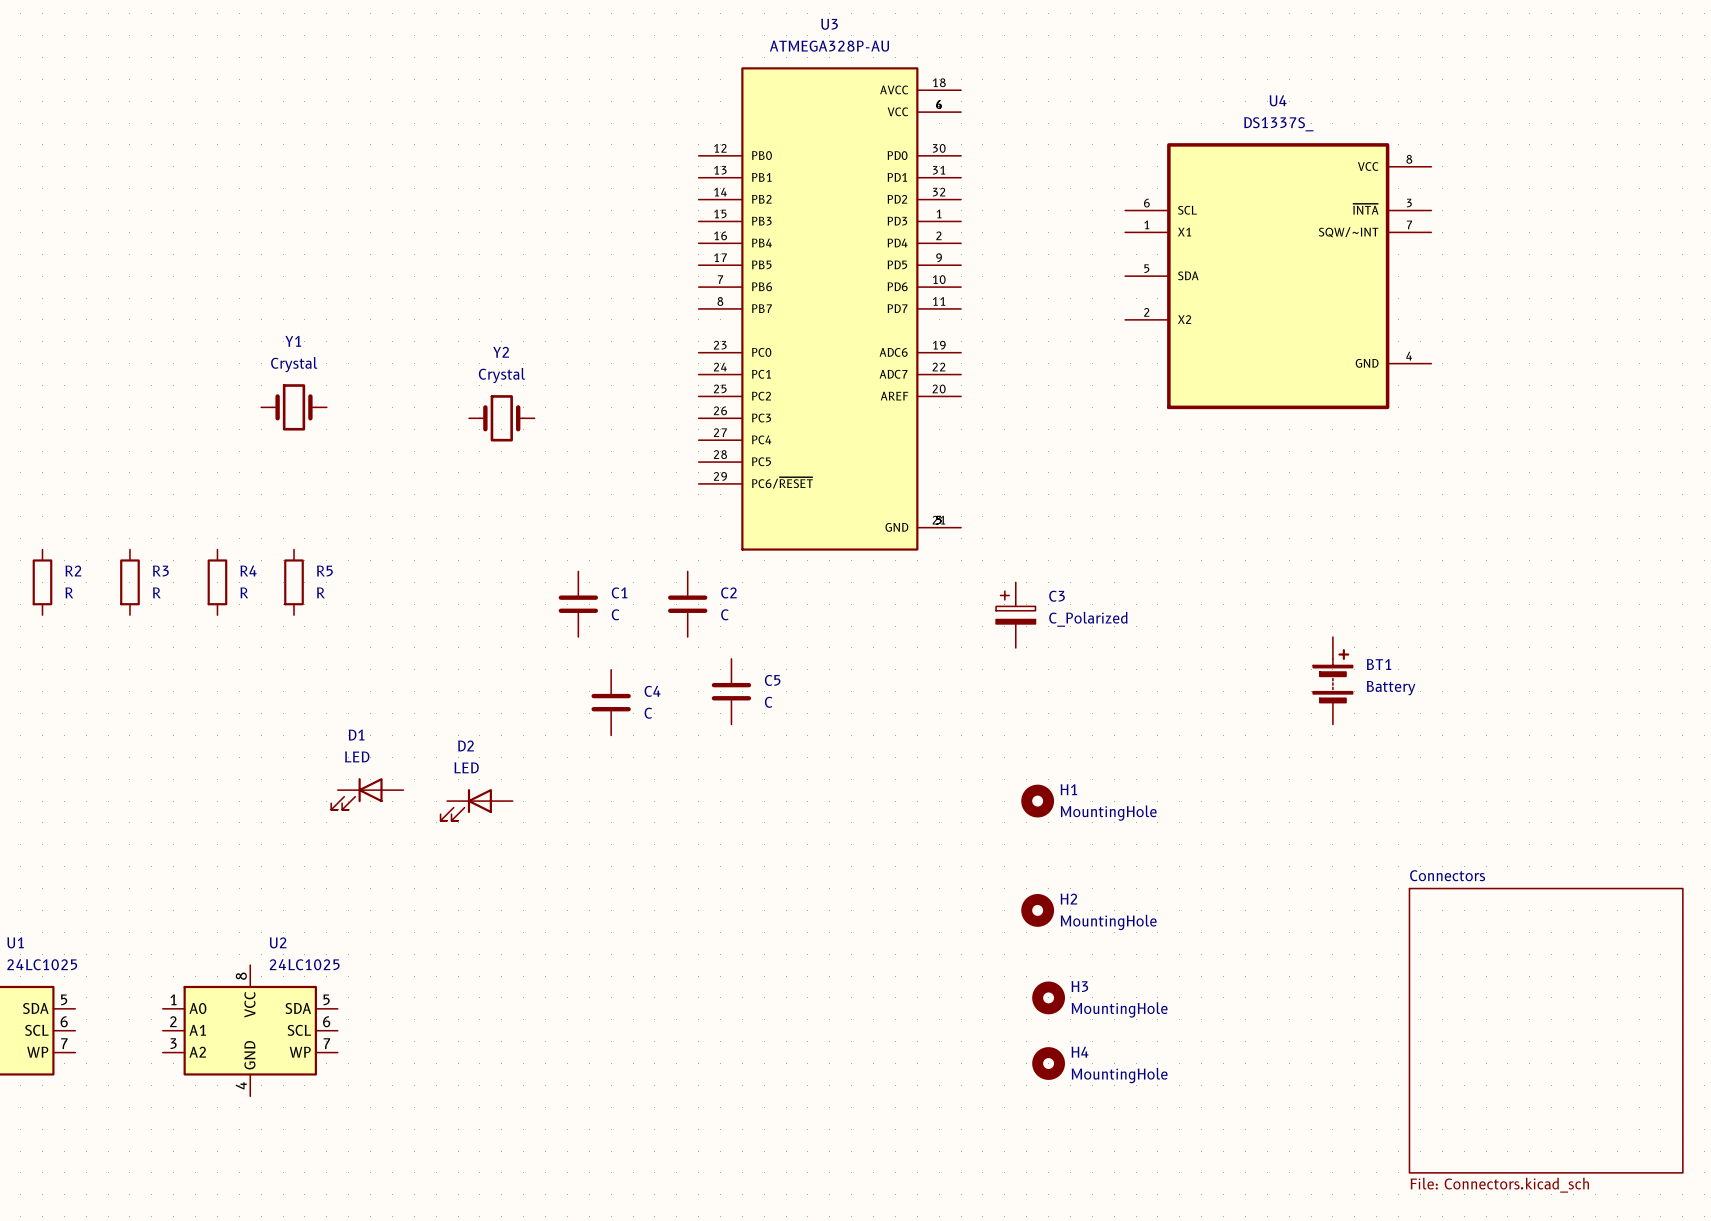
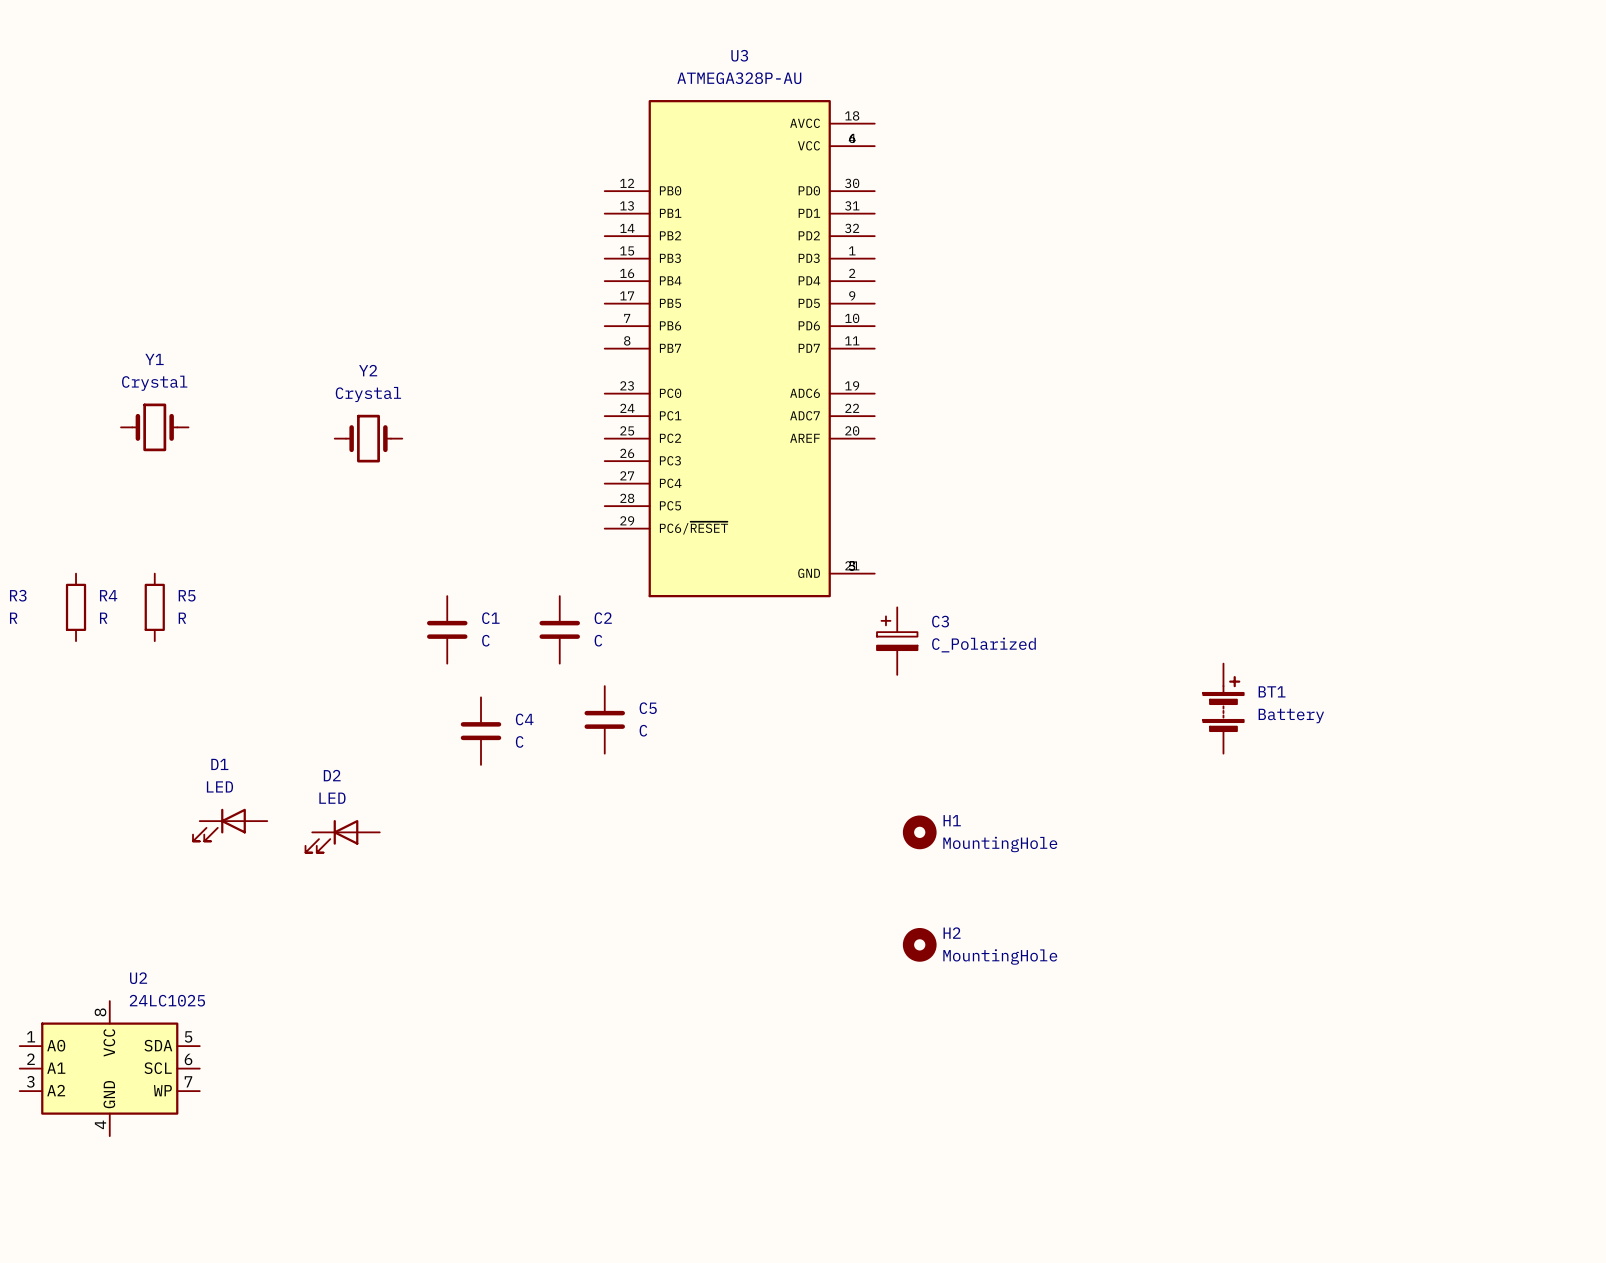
U4: DS1337S_ (1278, 276) -> none
U3 position: (829, 308) -> (739, 348)
H3: MountingHole (1048, 997) -> none
sheet Connectors: File: Connectors.kicad_sch (1546, 1030) -> none
H4: MountingHole (1048, 1063) -> none

